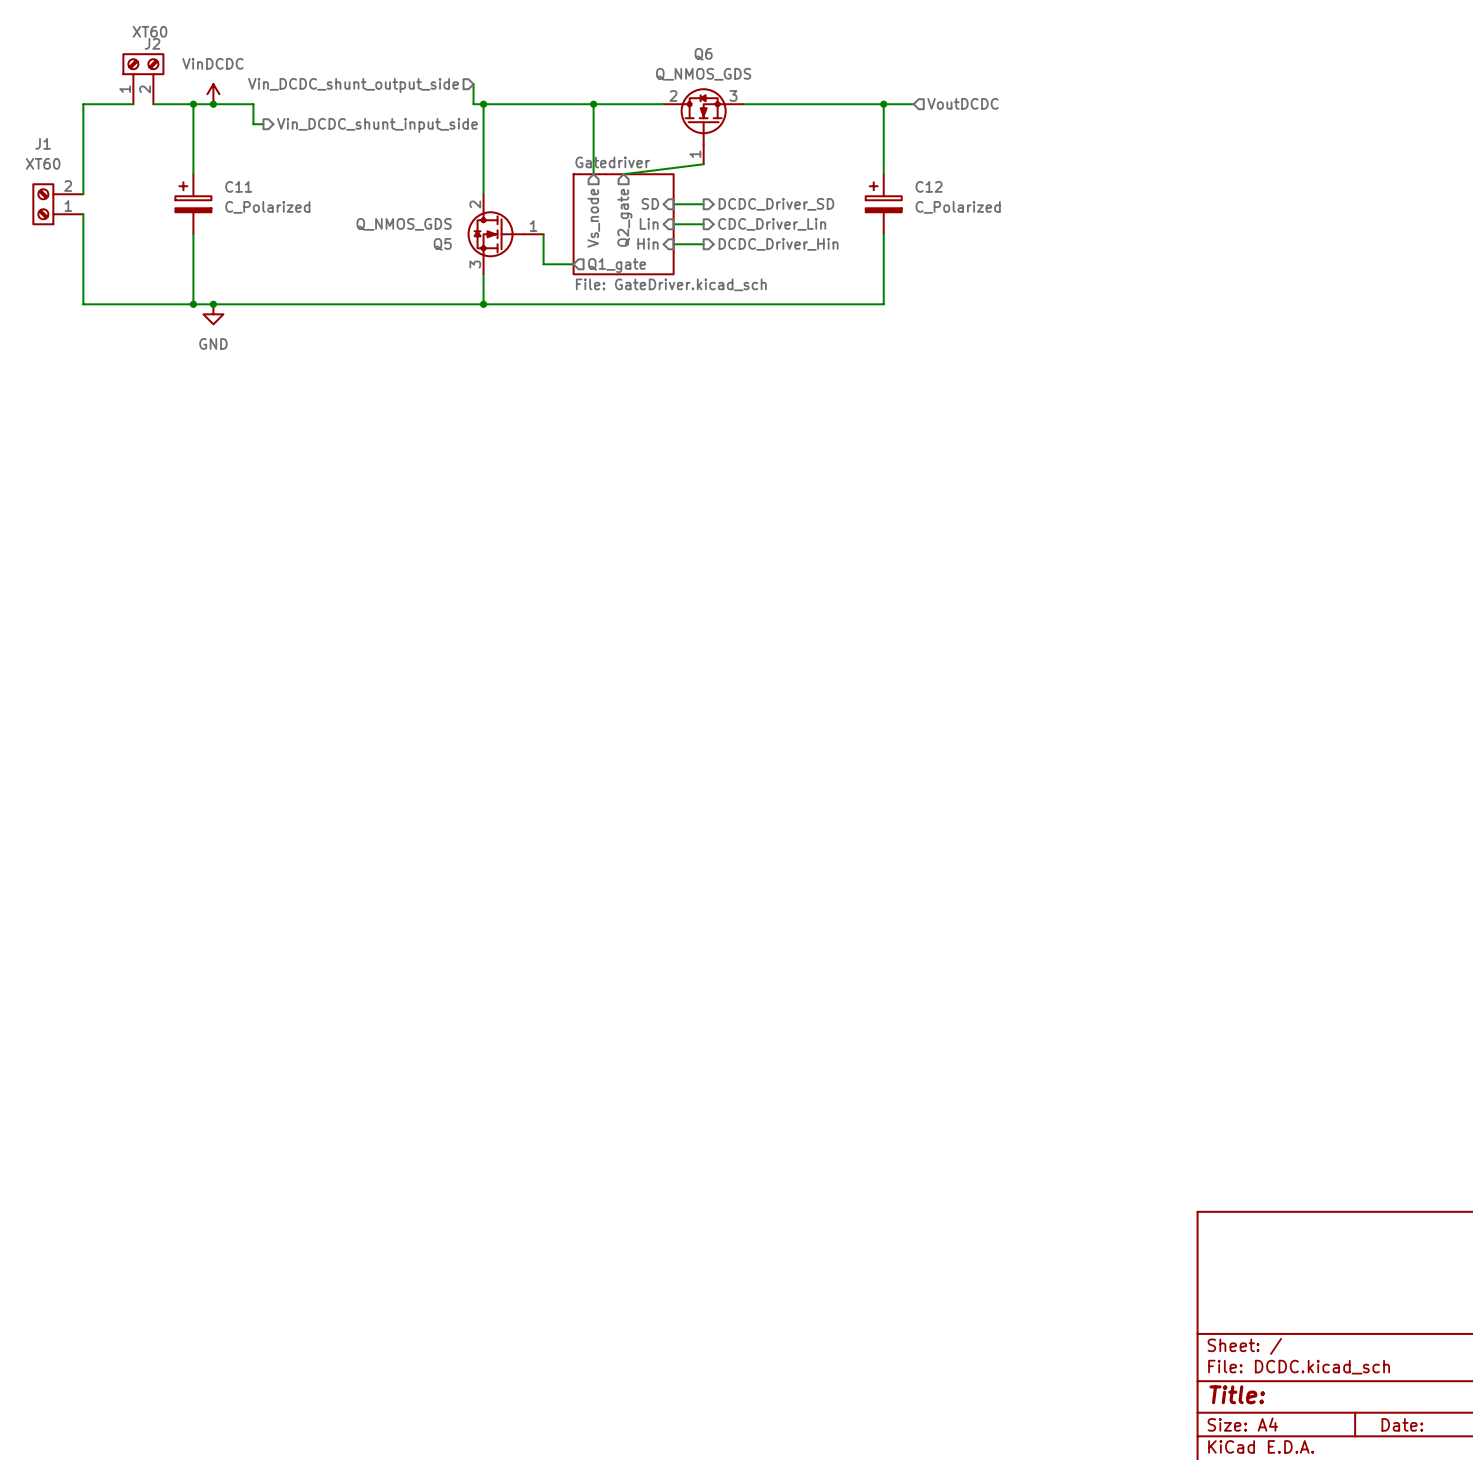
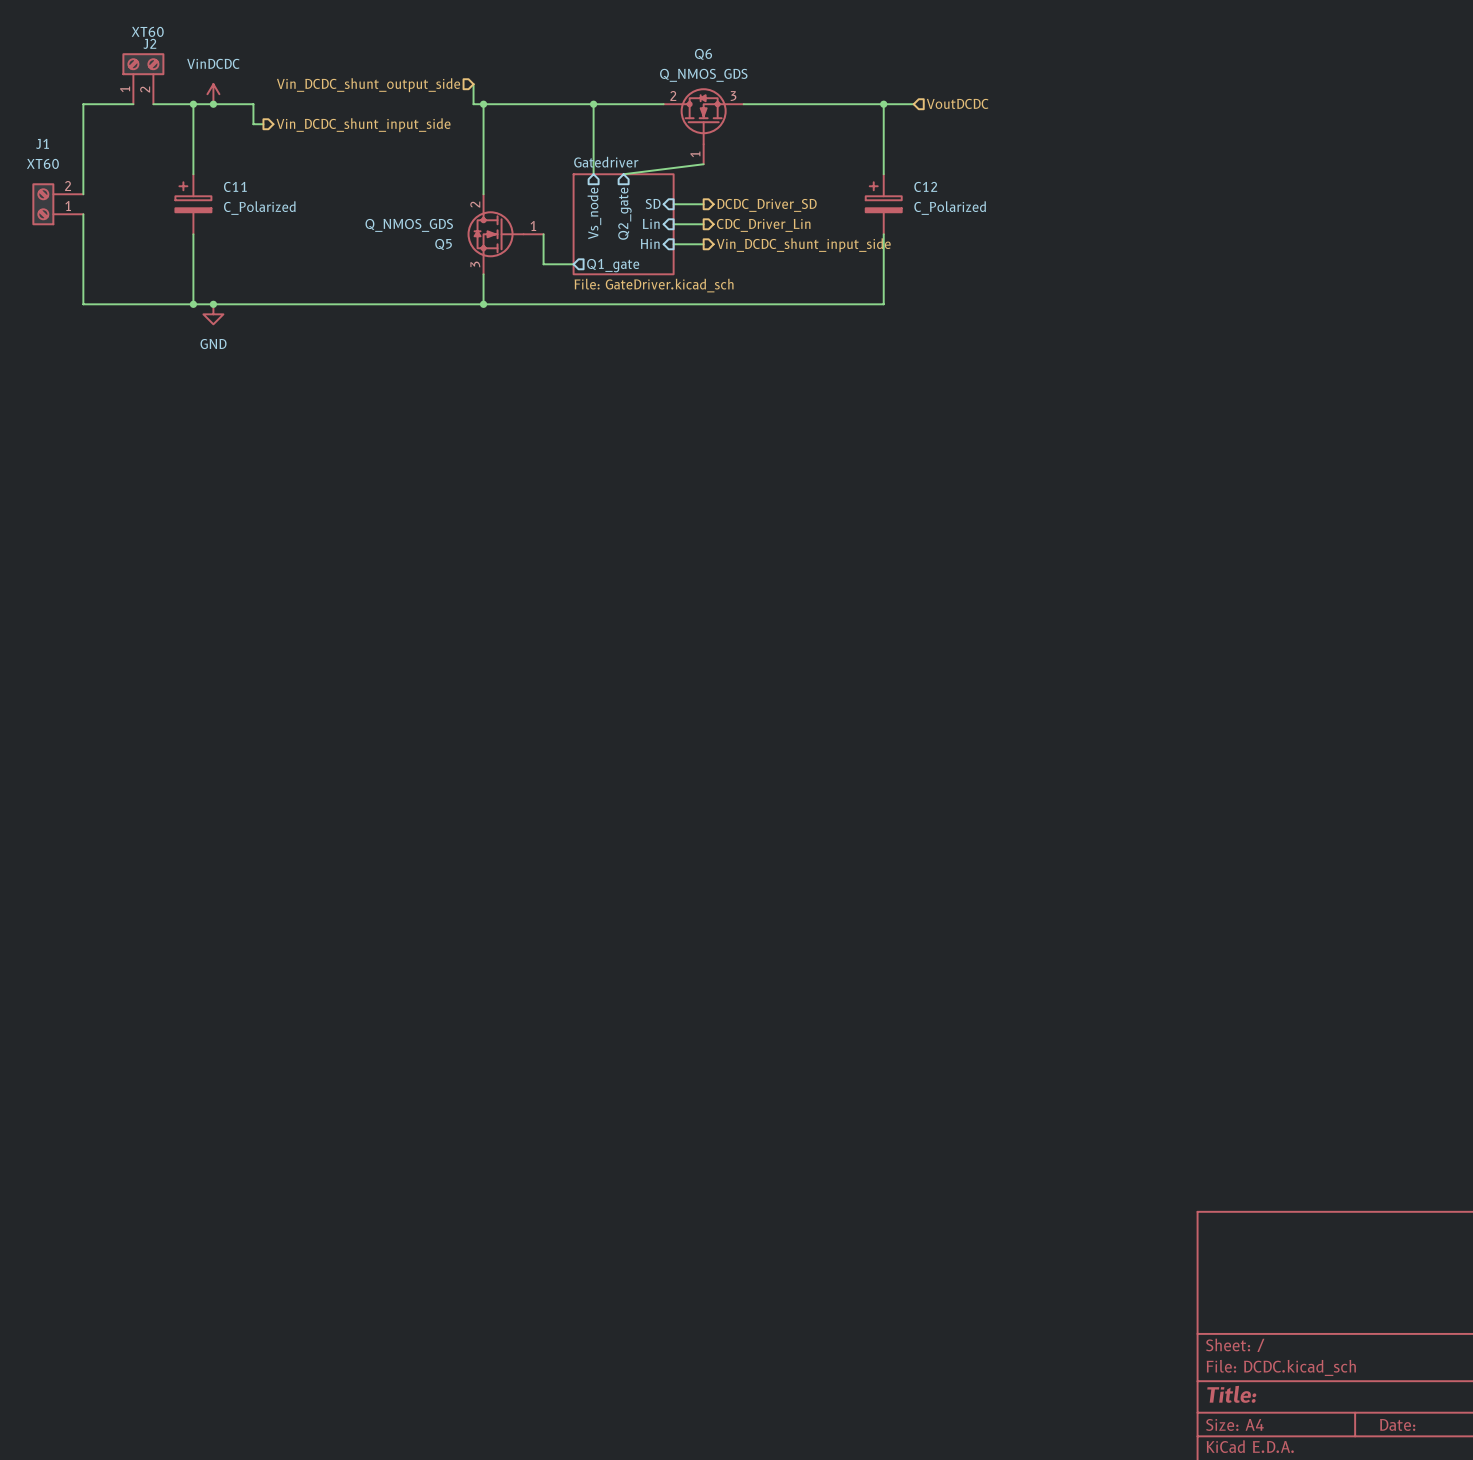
hierarchical label: DCDC_Driver_Hin (778, 244) -> Vin_DCDC_shunt_input_side (803, 245)

